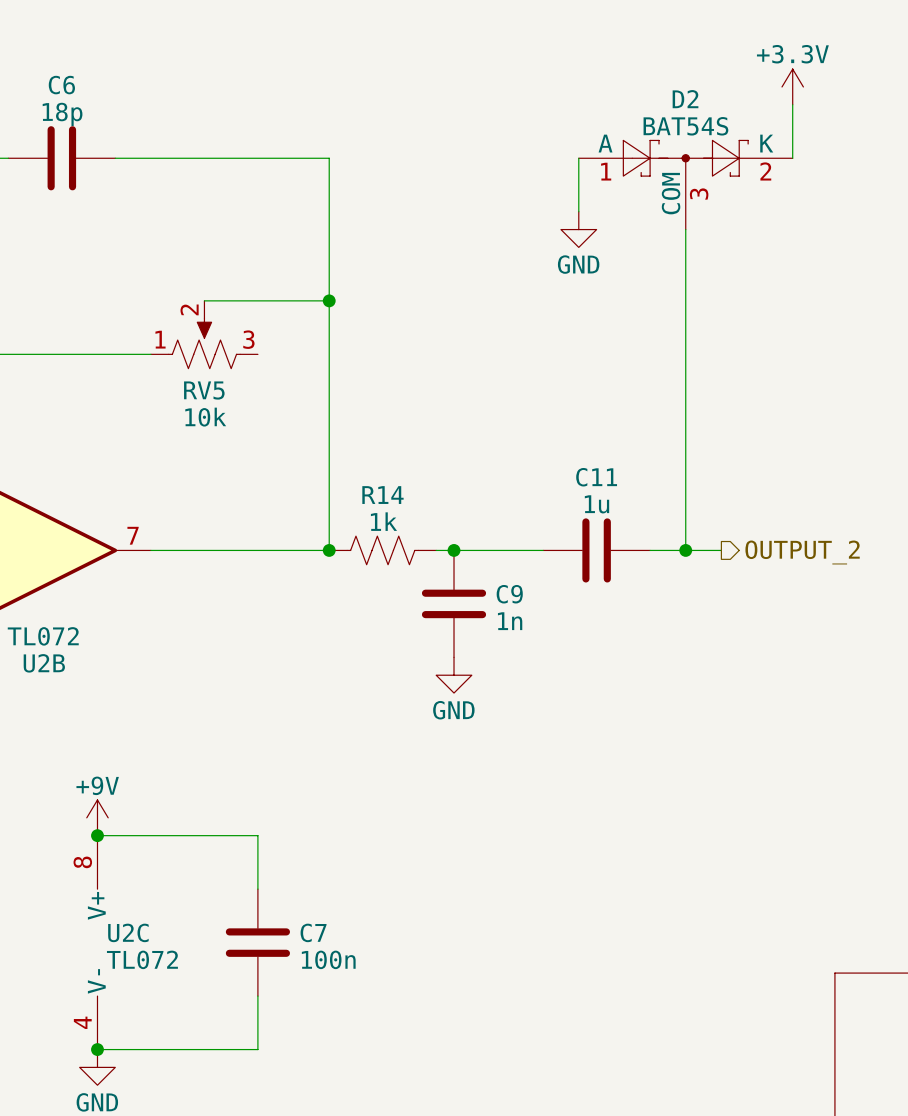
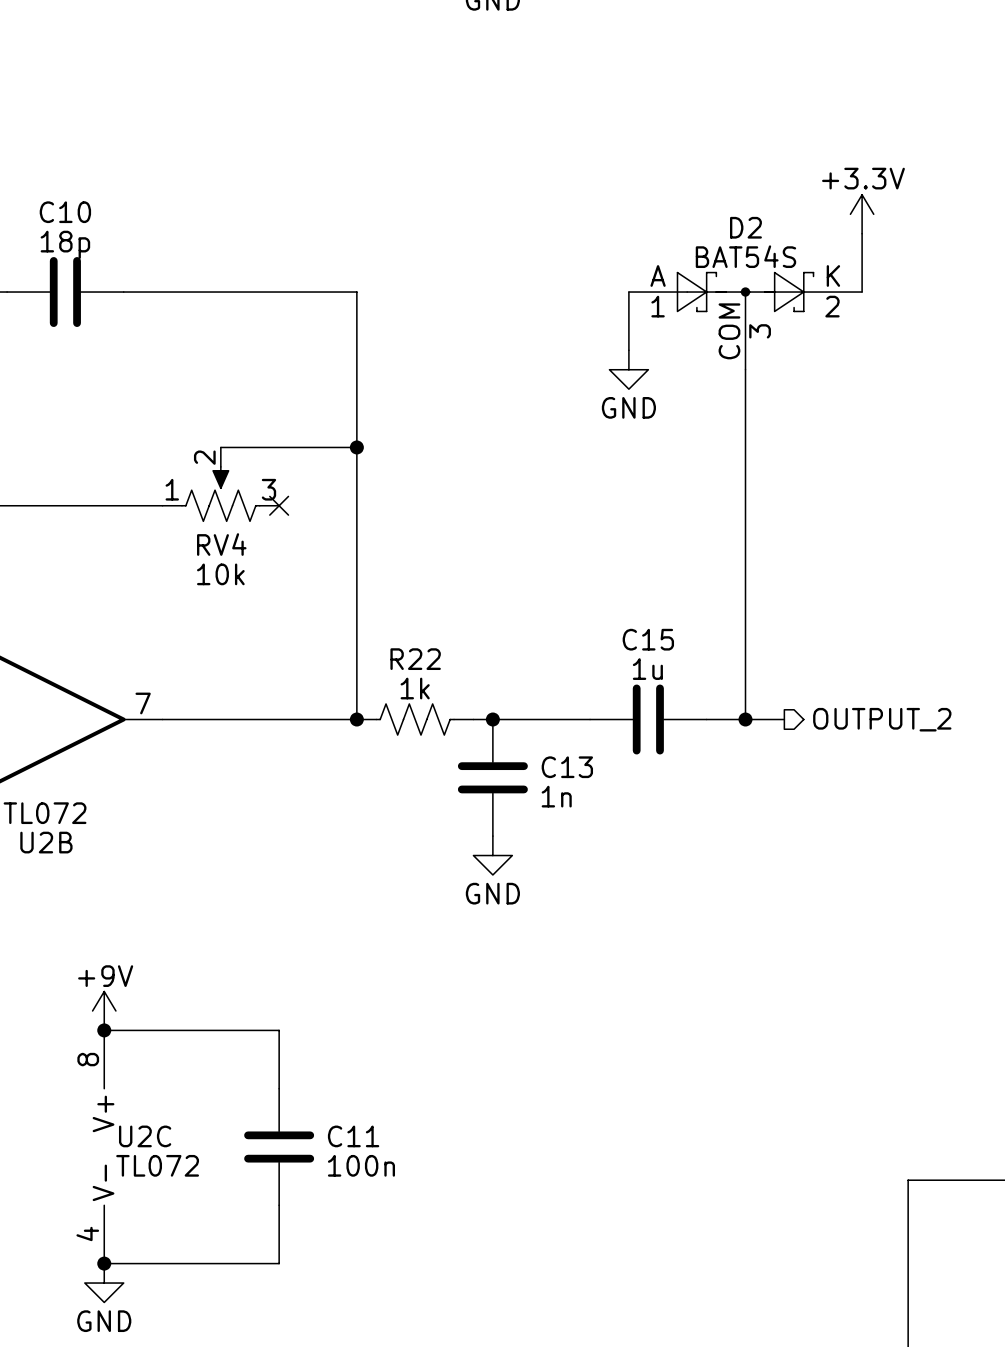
C6 name: C6 (61, 85) -> C10 (65, 212)
no-connect mark: none -> (279, 505)
RV5 name: RV5 (204, 390) -> RV4 (221, 544)
C11 name: C11 (596, 477) -> C15 (648, 639)
R14 name: R14 (382, 495) -> R22 (415, 659)
C9 name: C9 (509, 594) -> C13 (567, 767)
C7 name: C7 (313, 932) -> C11 (353, 1136)

